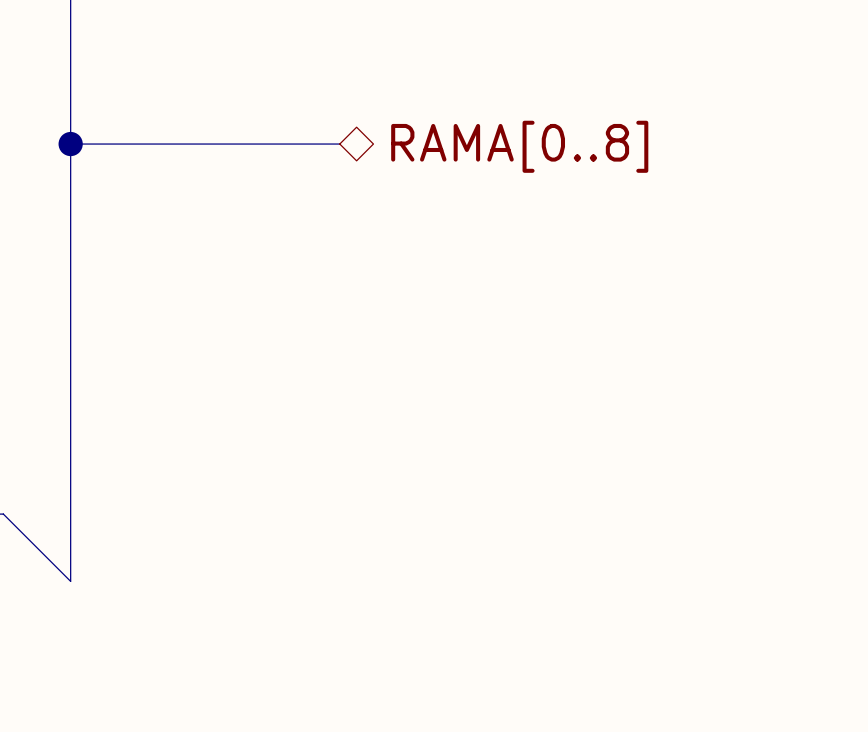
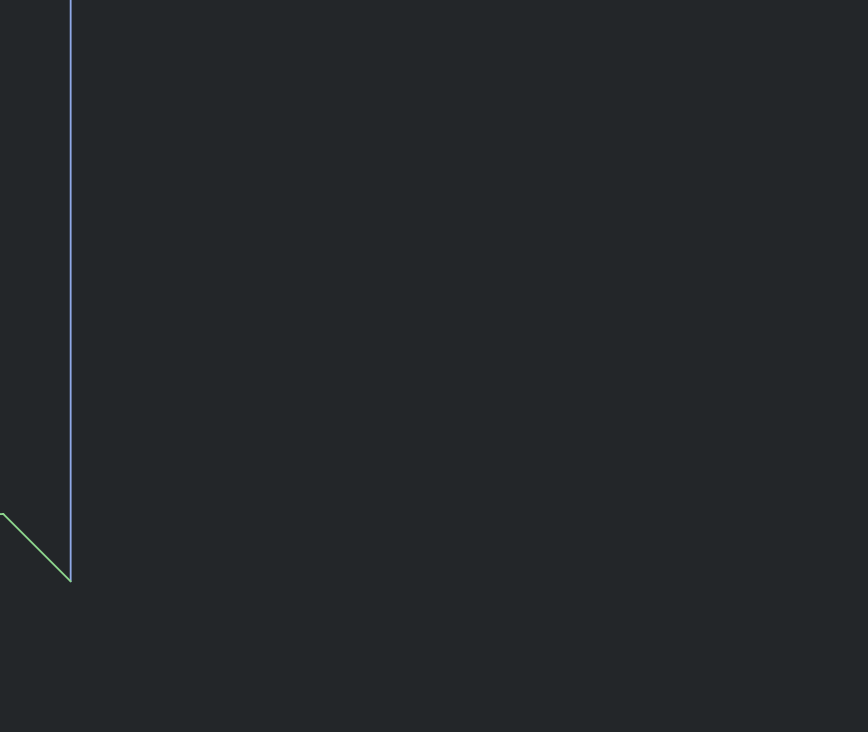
bus: (70, 144) (339, 144) -> none
junction: (70, 144) -> none
hierarchical label: RAMA[0..8] (519, 146) -> none

